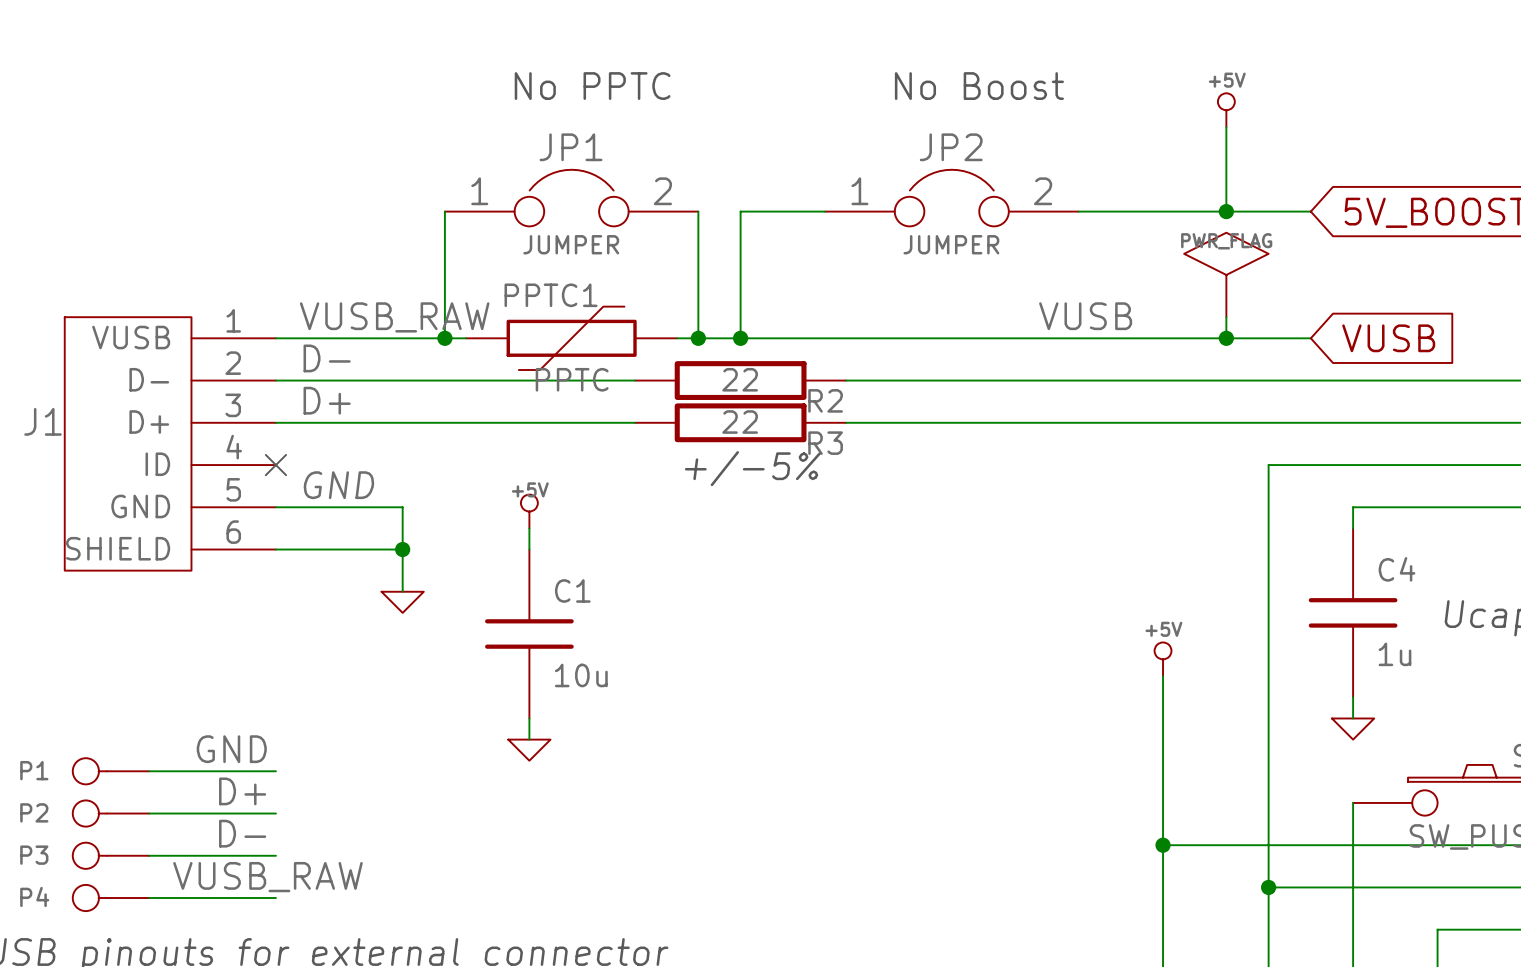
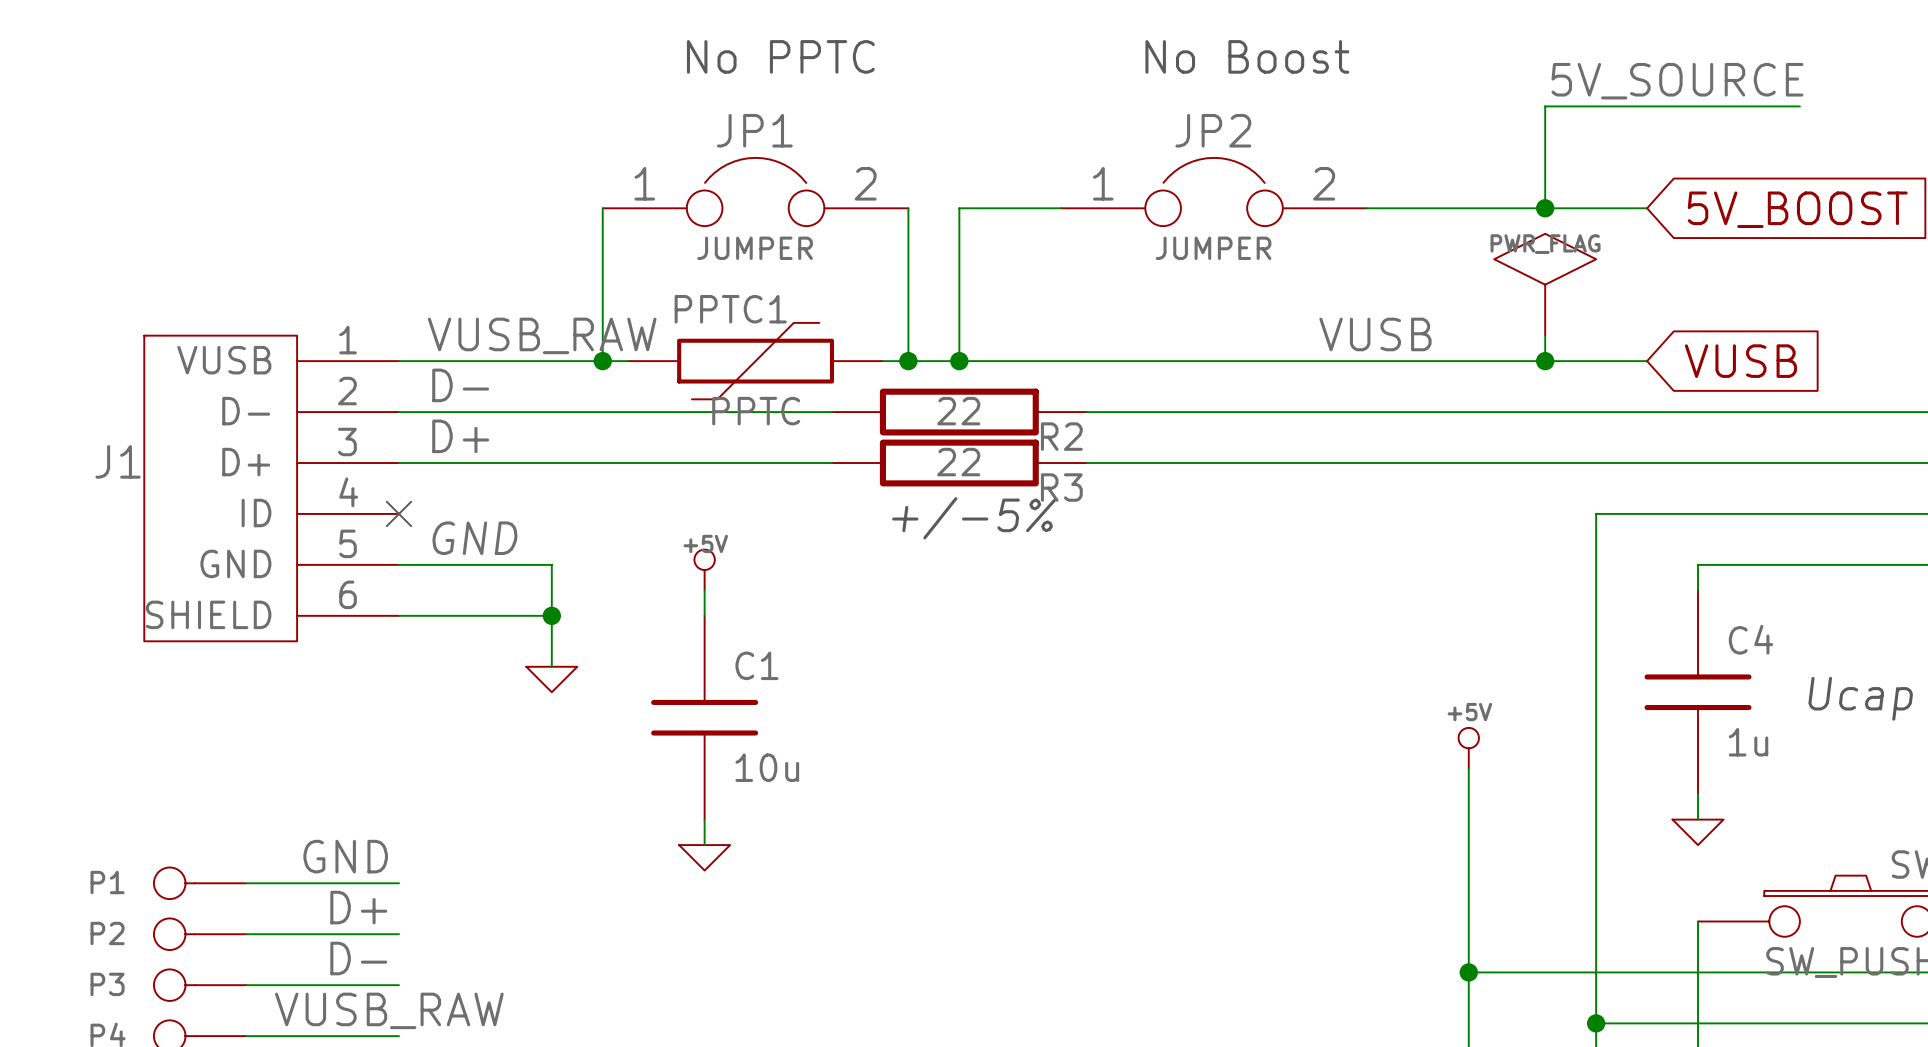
label: none -> 5V_SOURCE (1677, 81)
power symbol: +5V (1226, 110) -> none
wire: none -> (1545, 106) (1799, 106)

